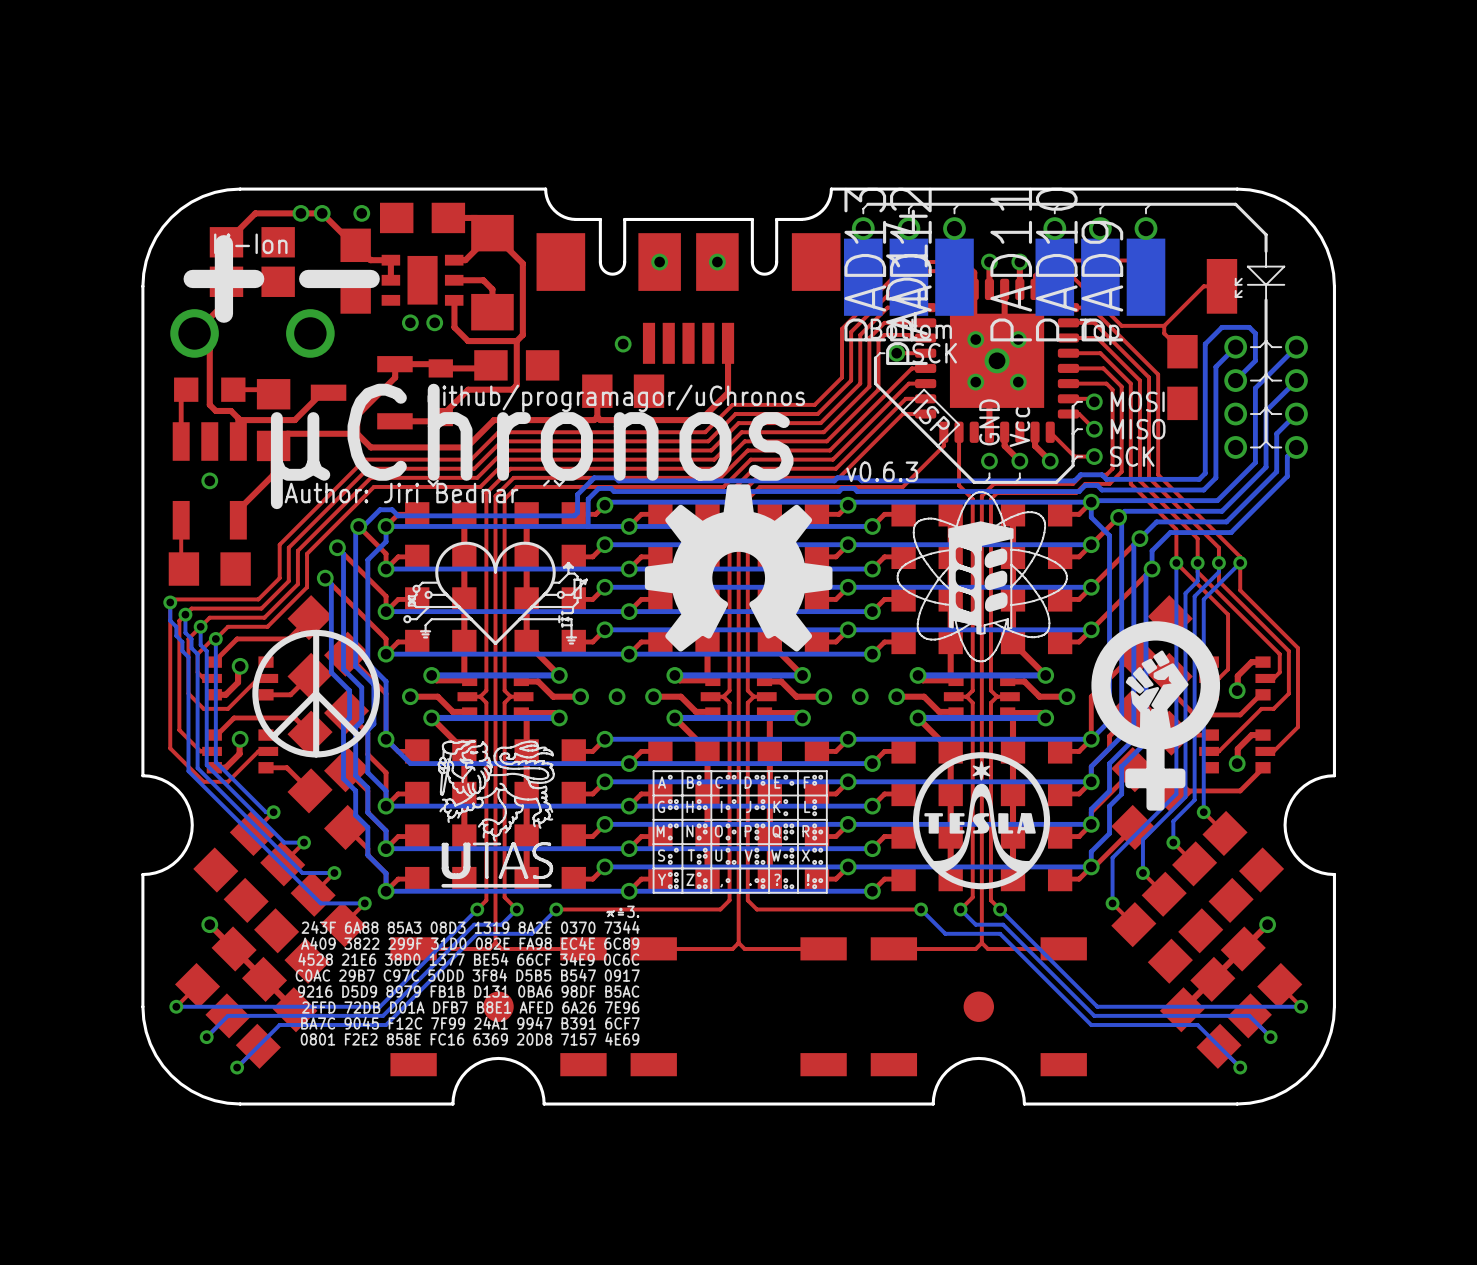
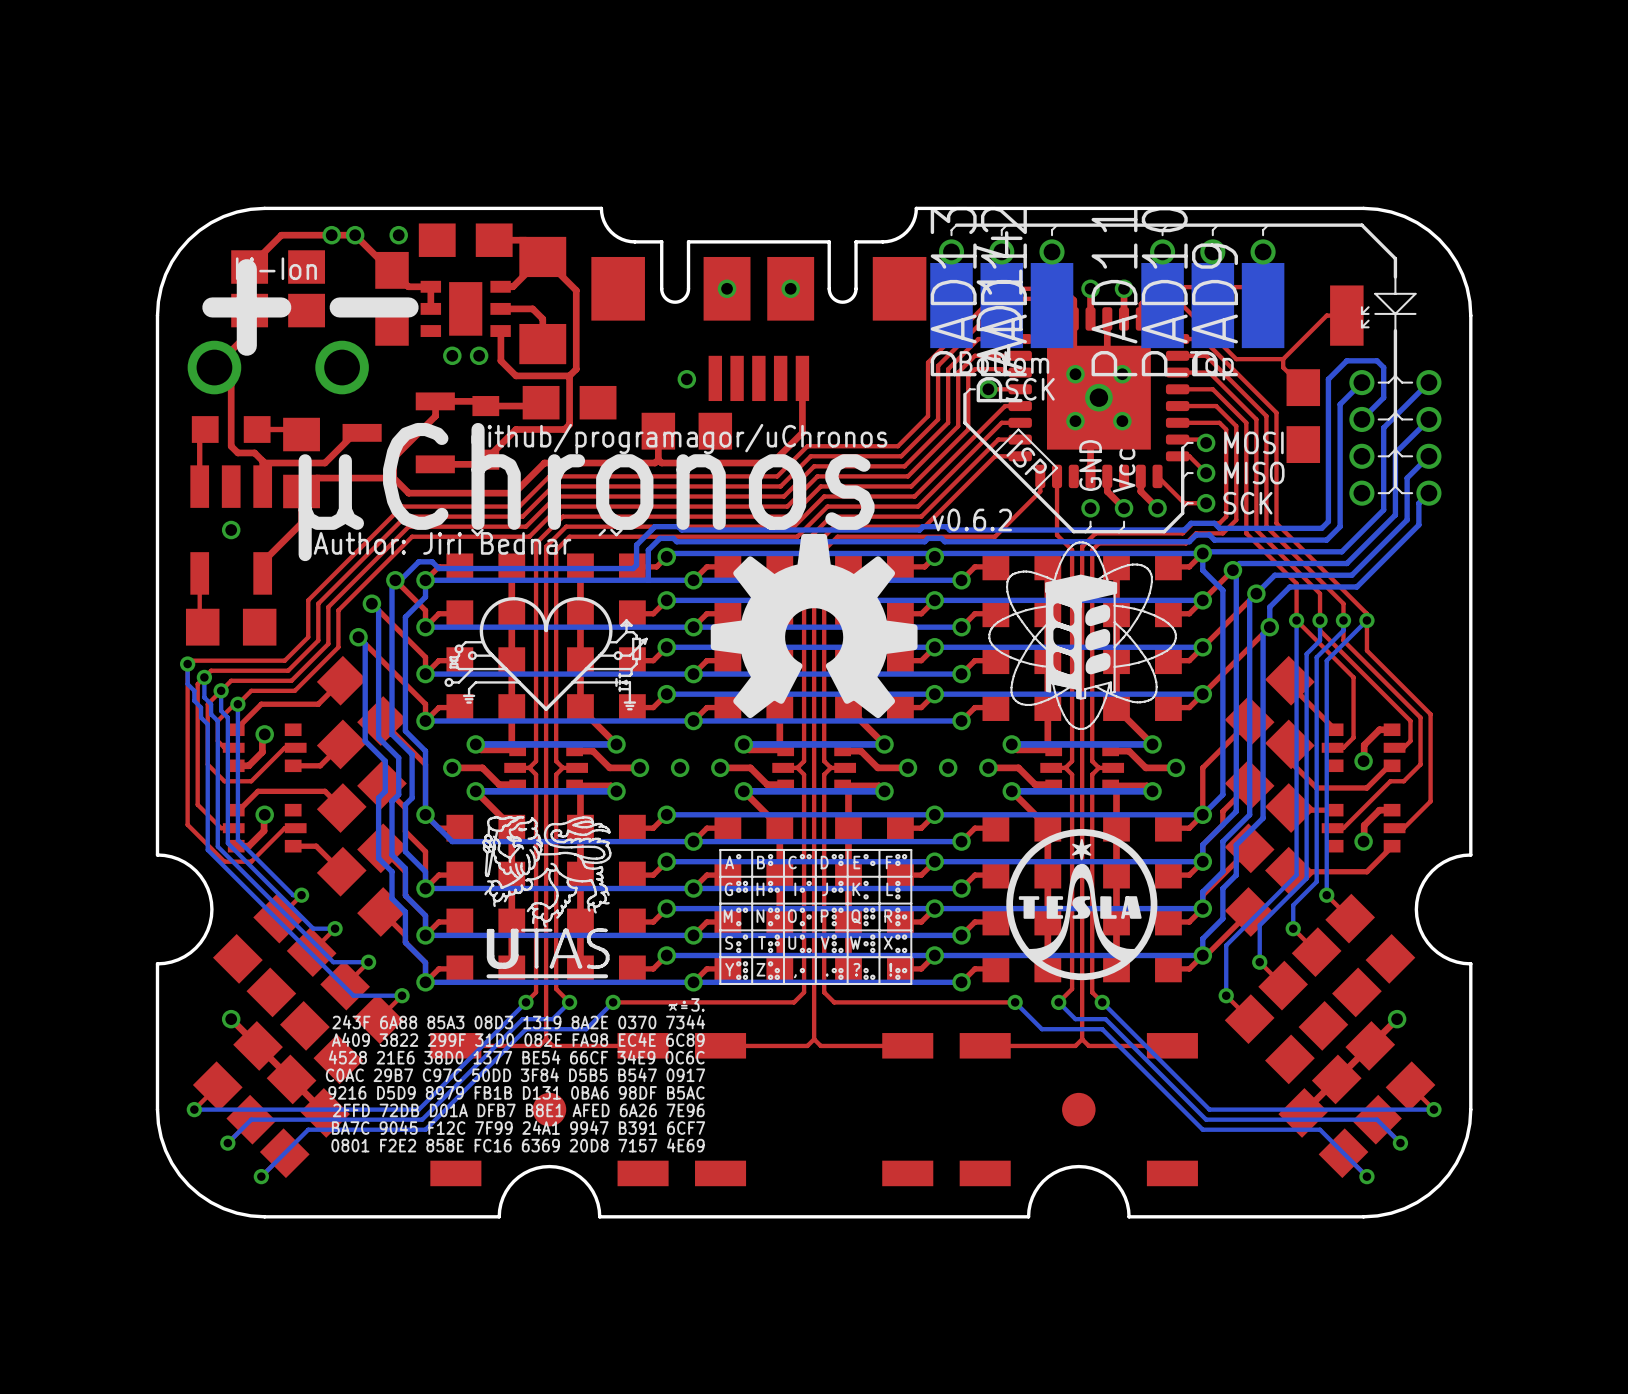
text: v0.6.3 (882, 471) -> v0.6.2 (972, 519)
drawing: [1091, 621, 1221, 811] -> none
drawing: [252, 629, 380, 758] -> none
line: (316, 632) (316, 754) -> none
line: (357, 734) (316, 693) (275, 734) -> none

